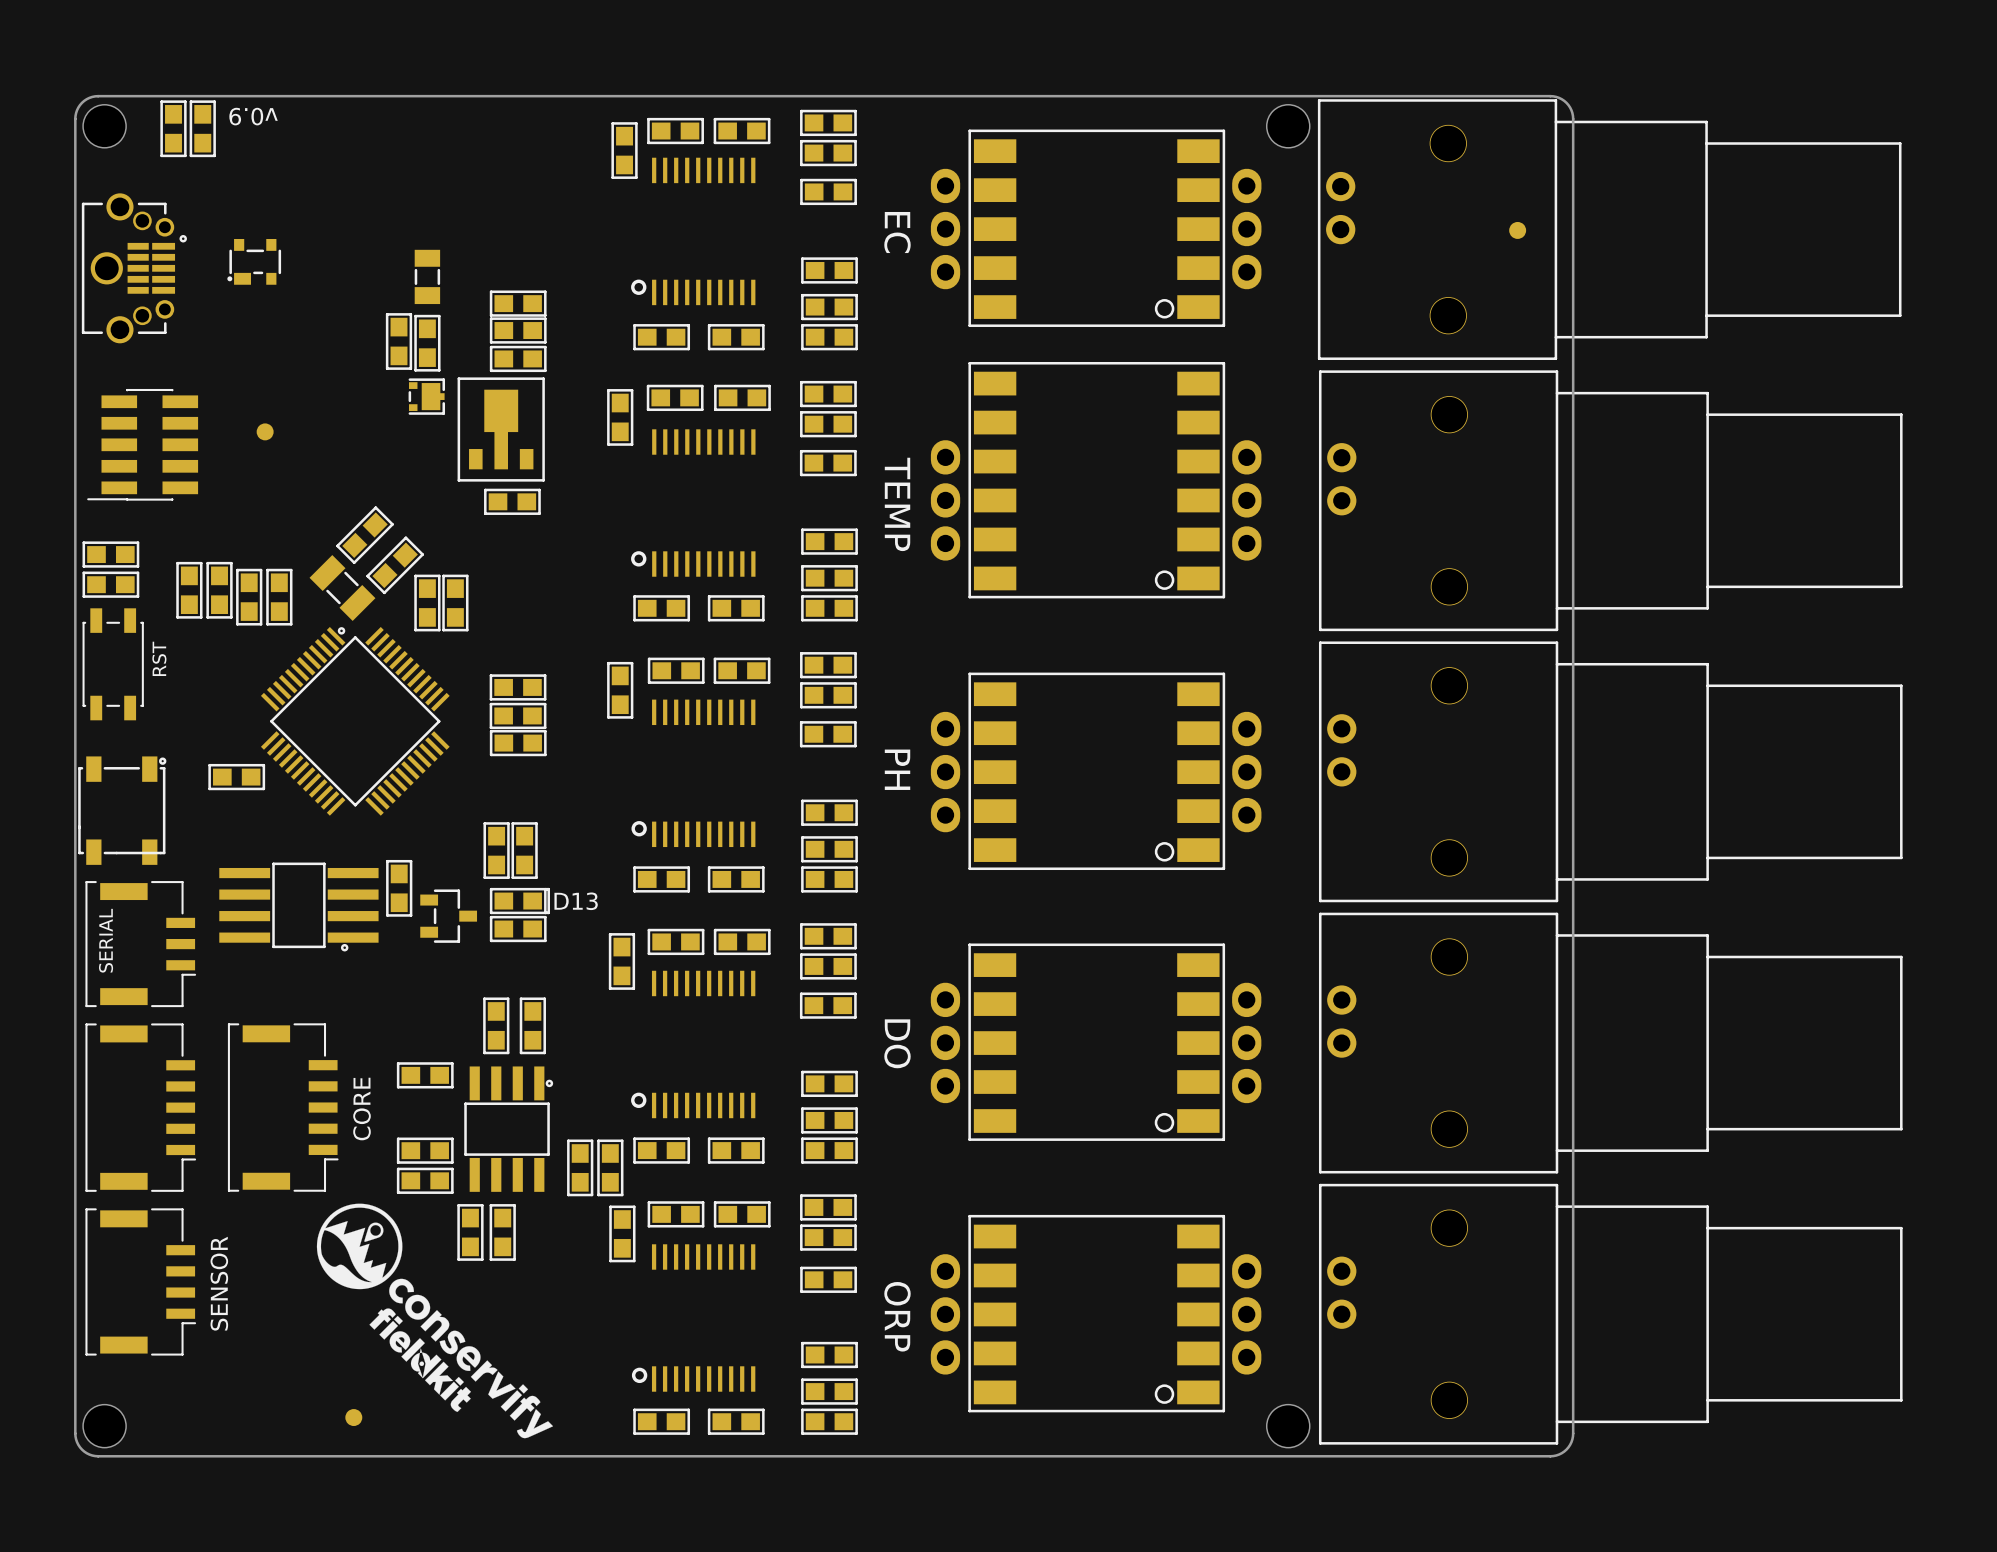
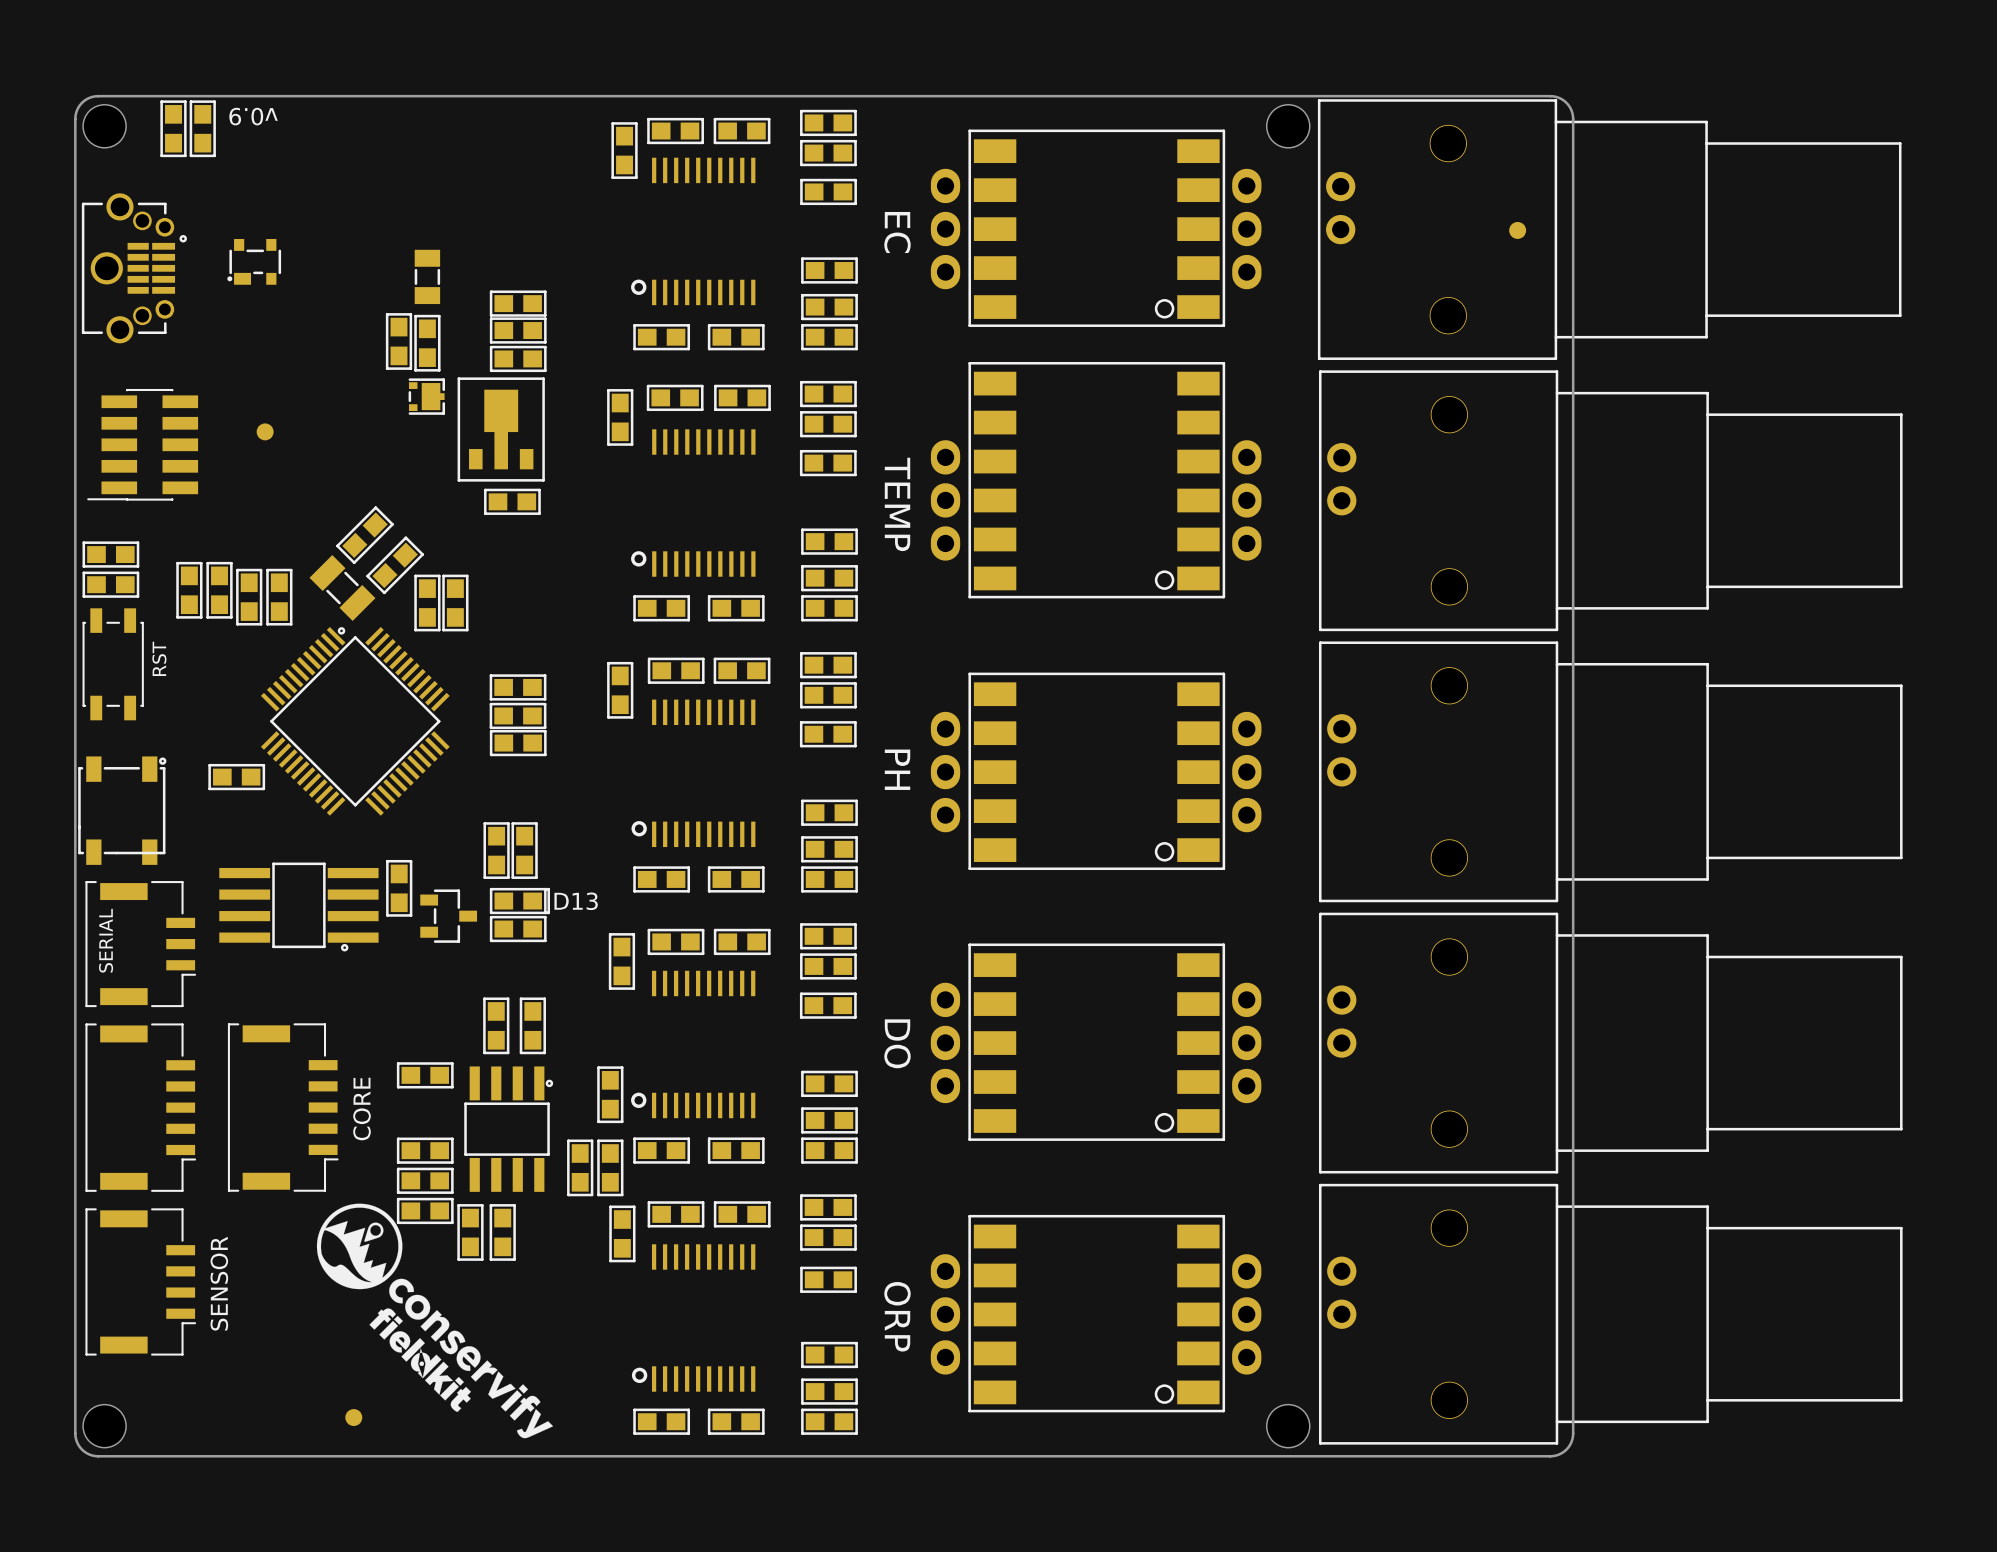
part: none -> (610, 1094)
part: none -> (425, 1210)

